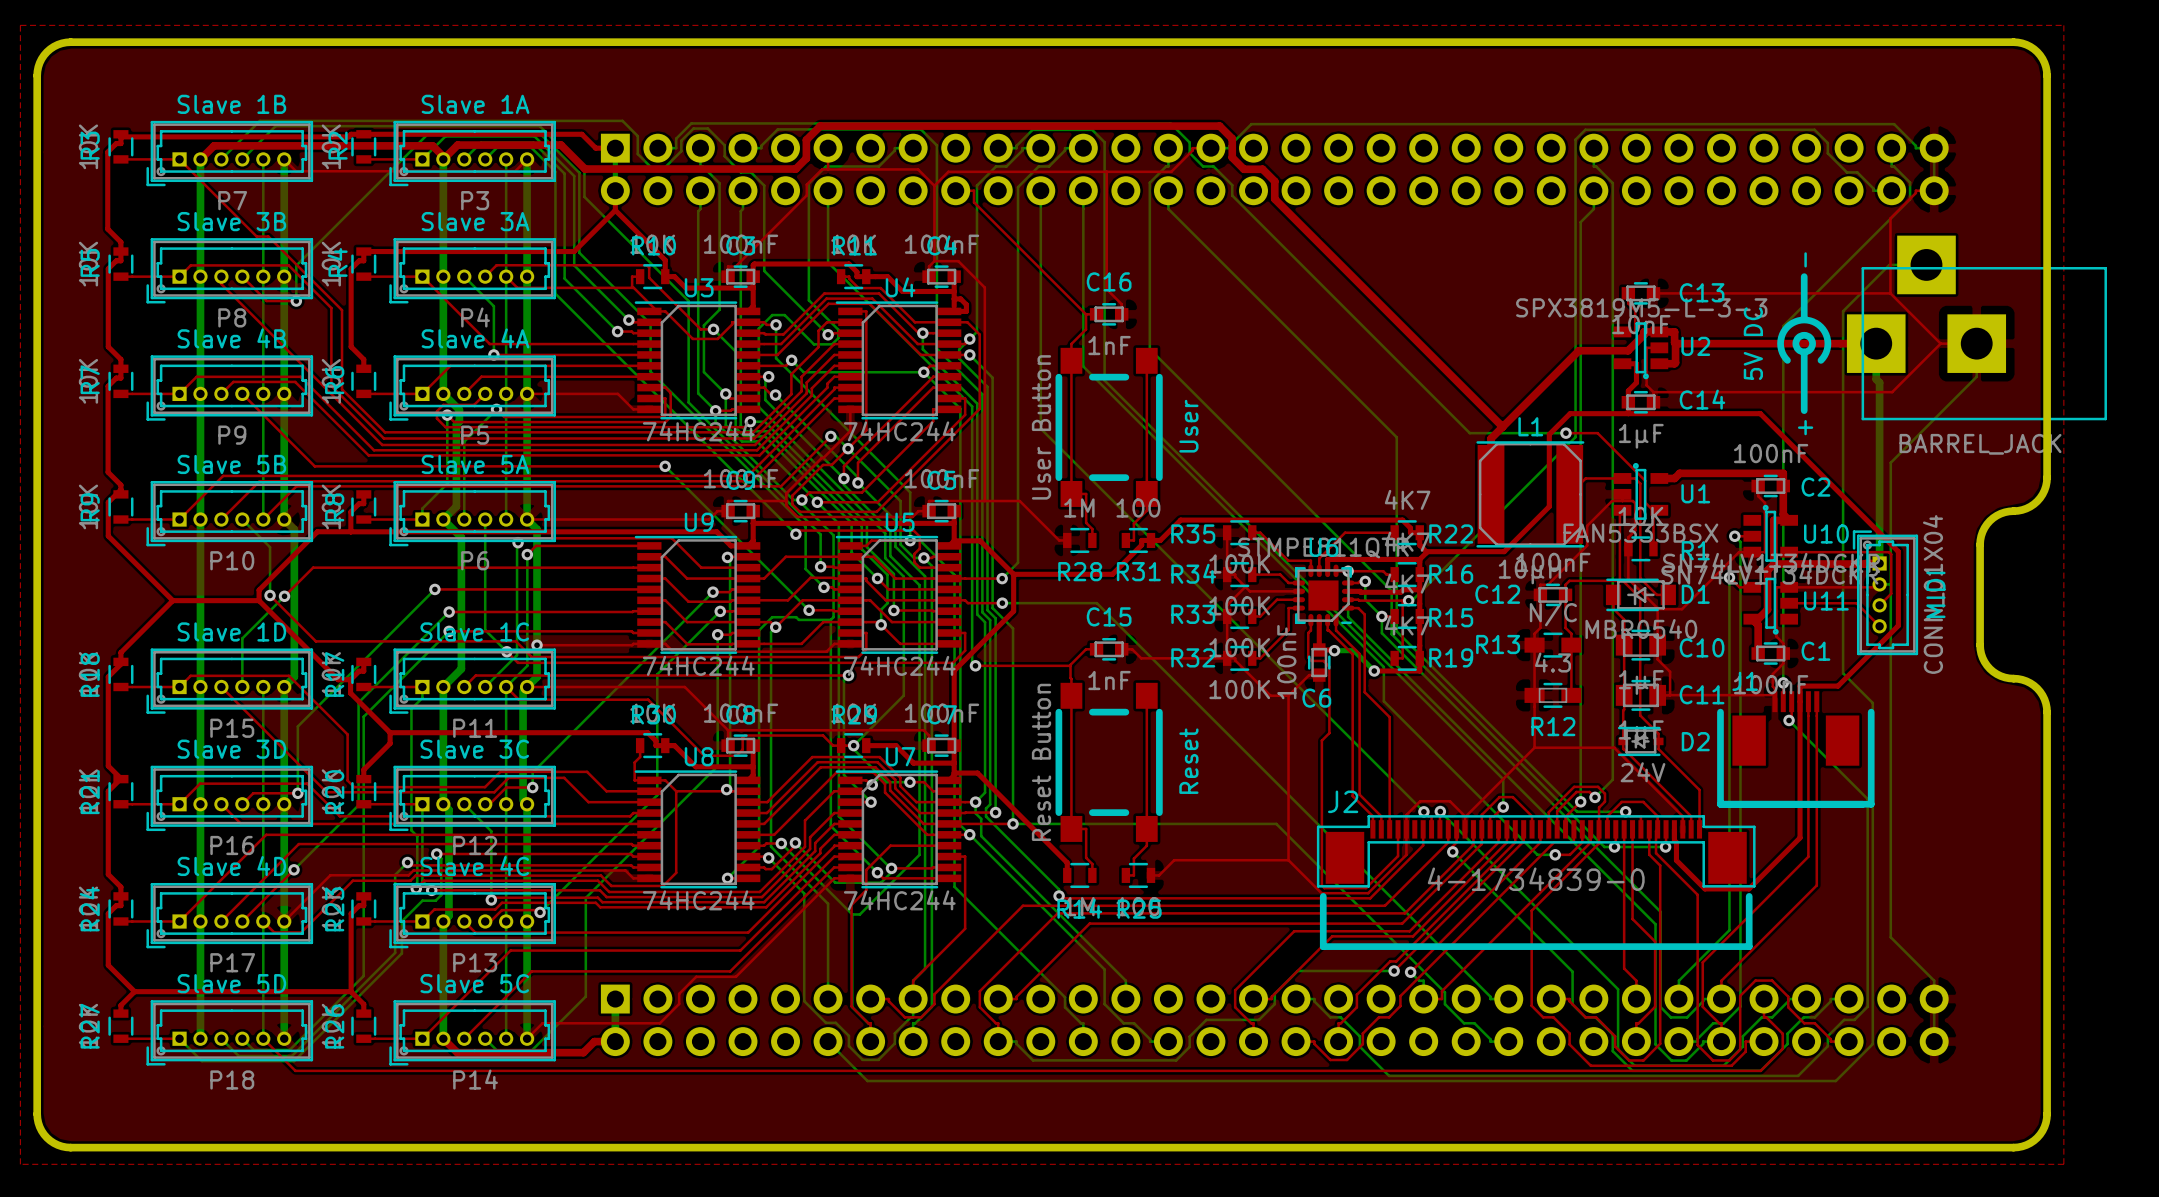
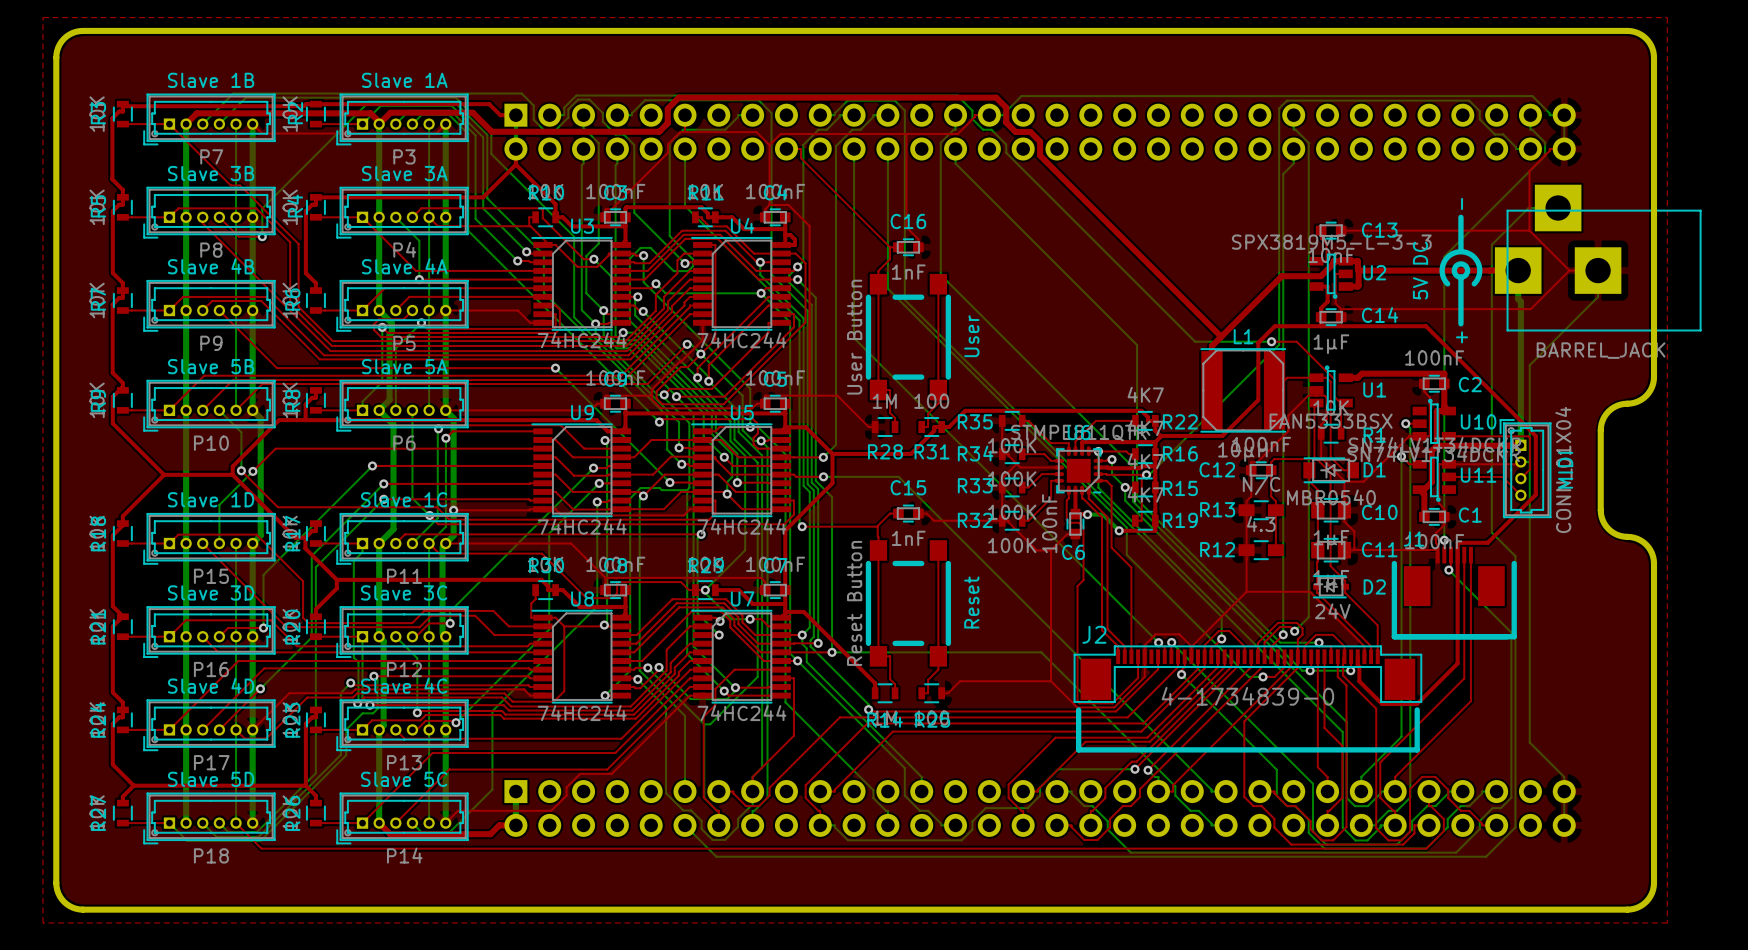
R12 footprint: [1524, 682, 1582, 708] -> [1238, 540, 1284, 561]
R12 name position: R12 (1553, 726) -> R12 (1217, 549)

